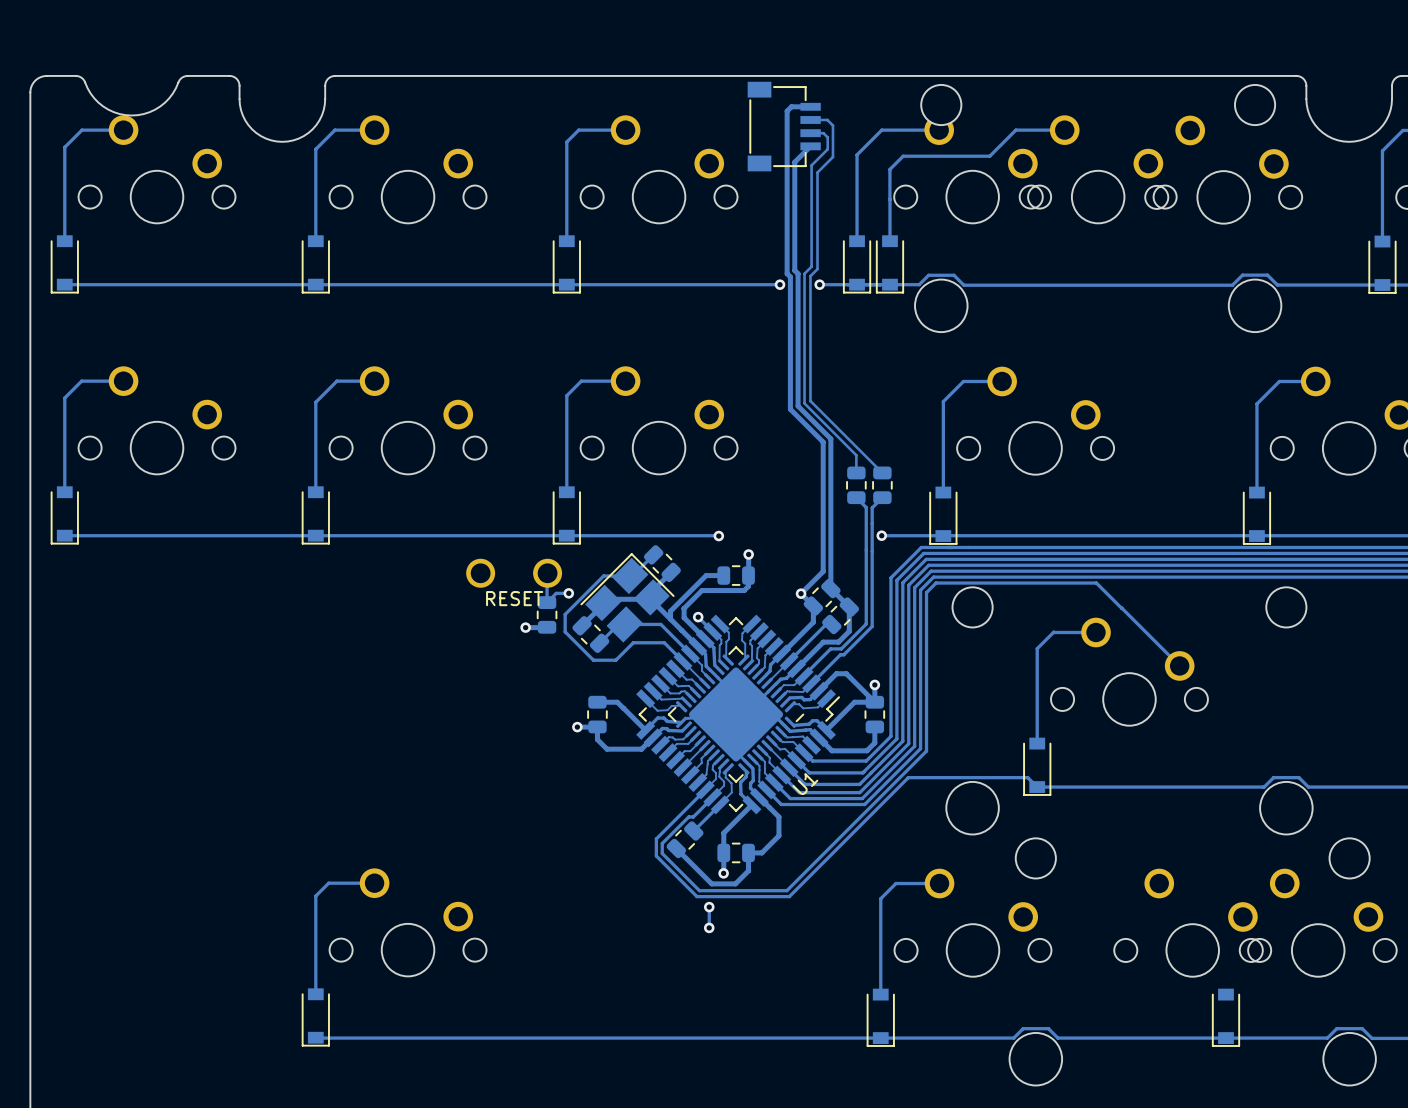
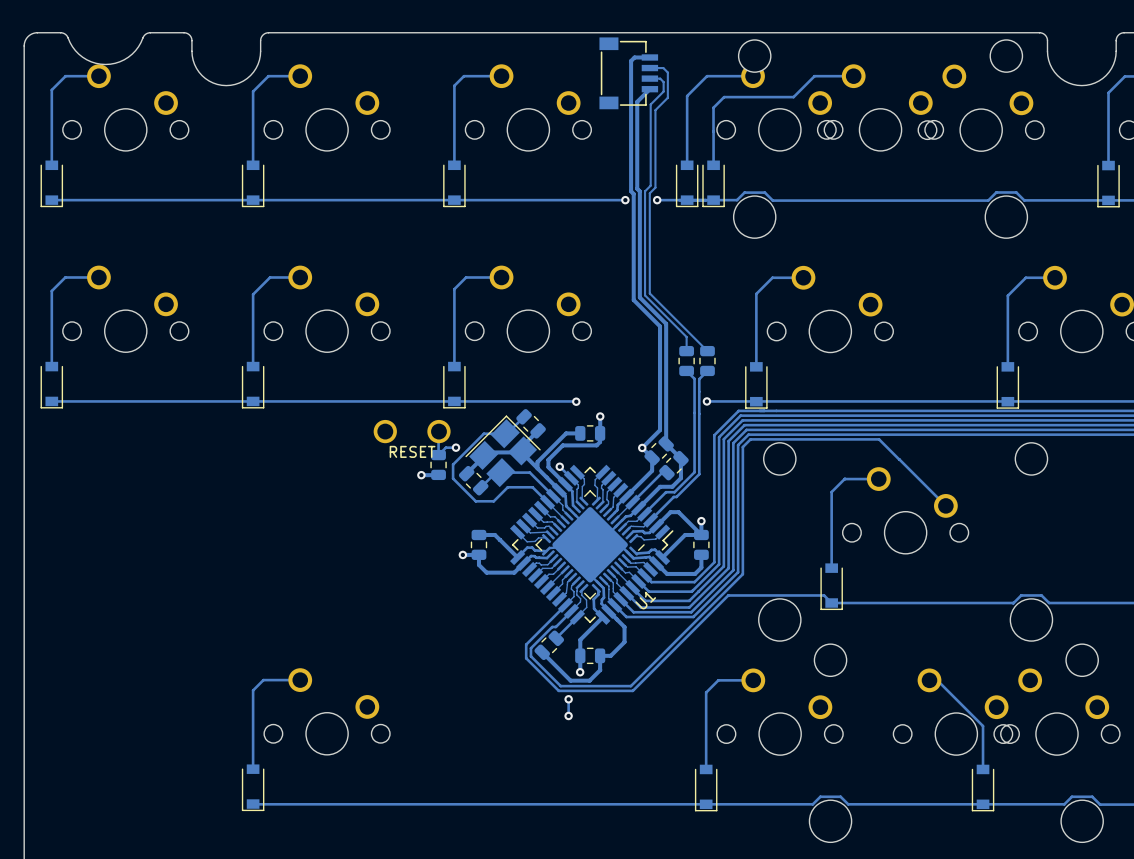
track: none -> (929, 680) (937, 680) (983, 726) (983, 769)

